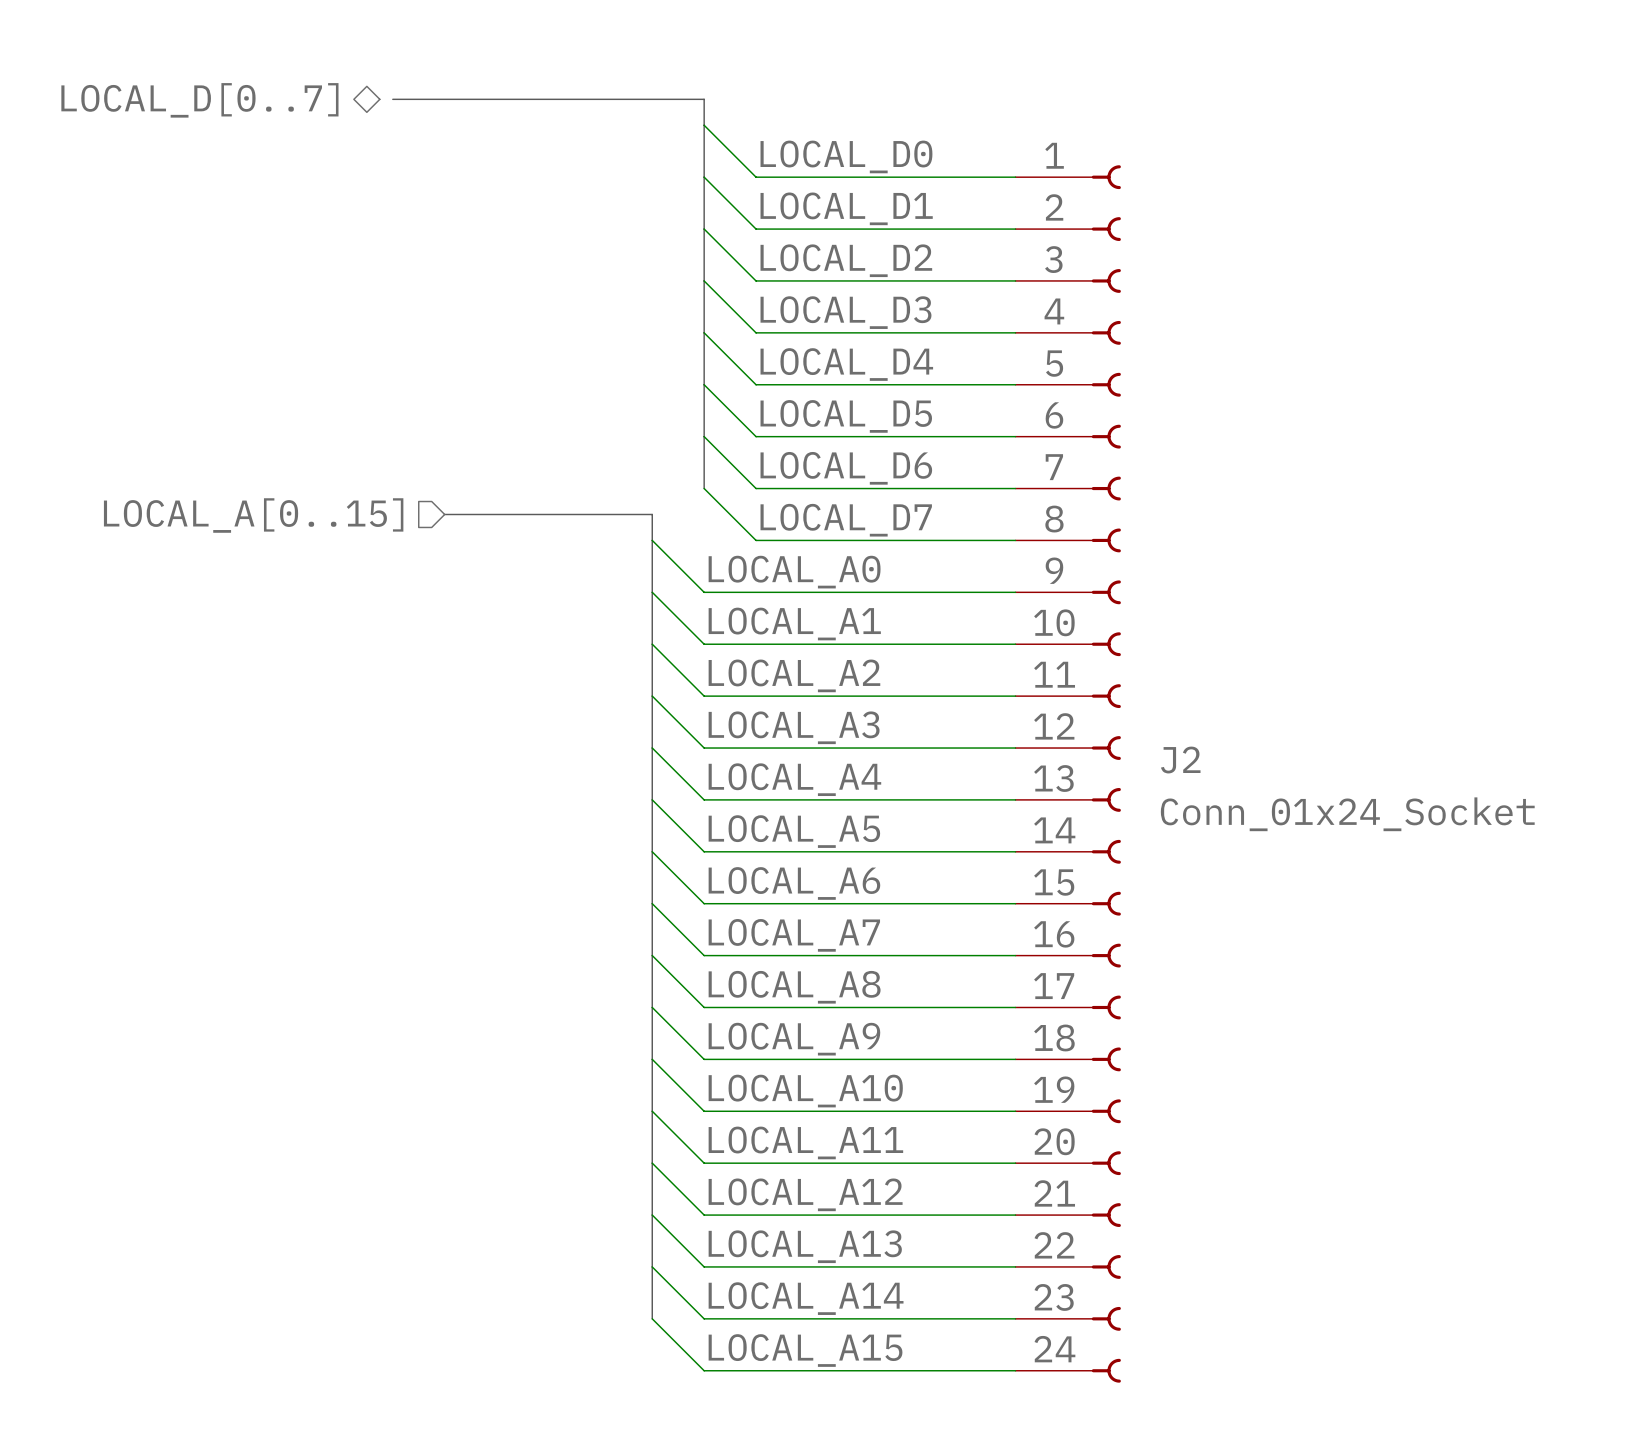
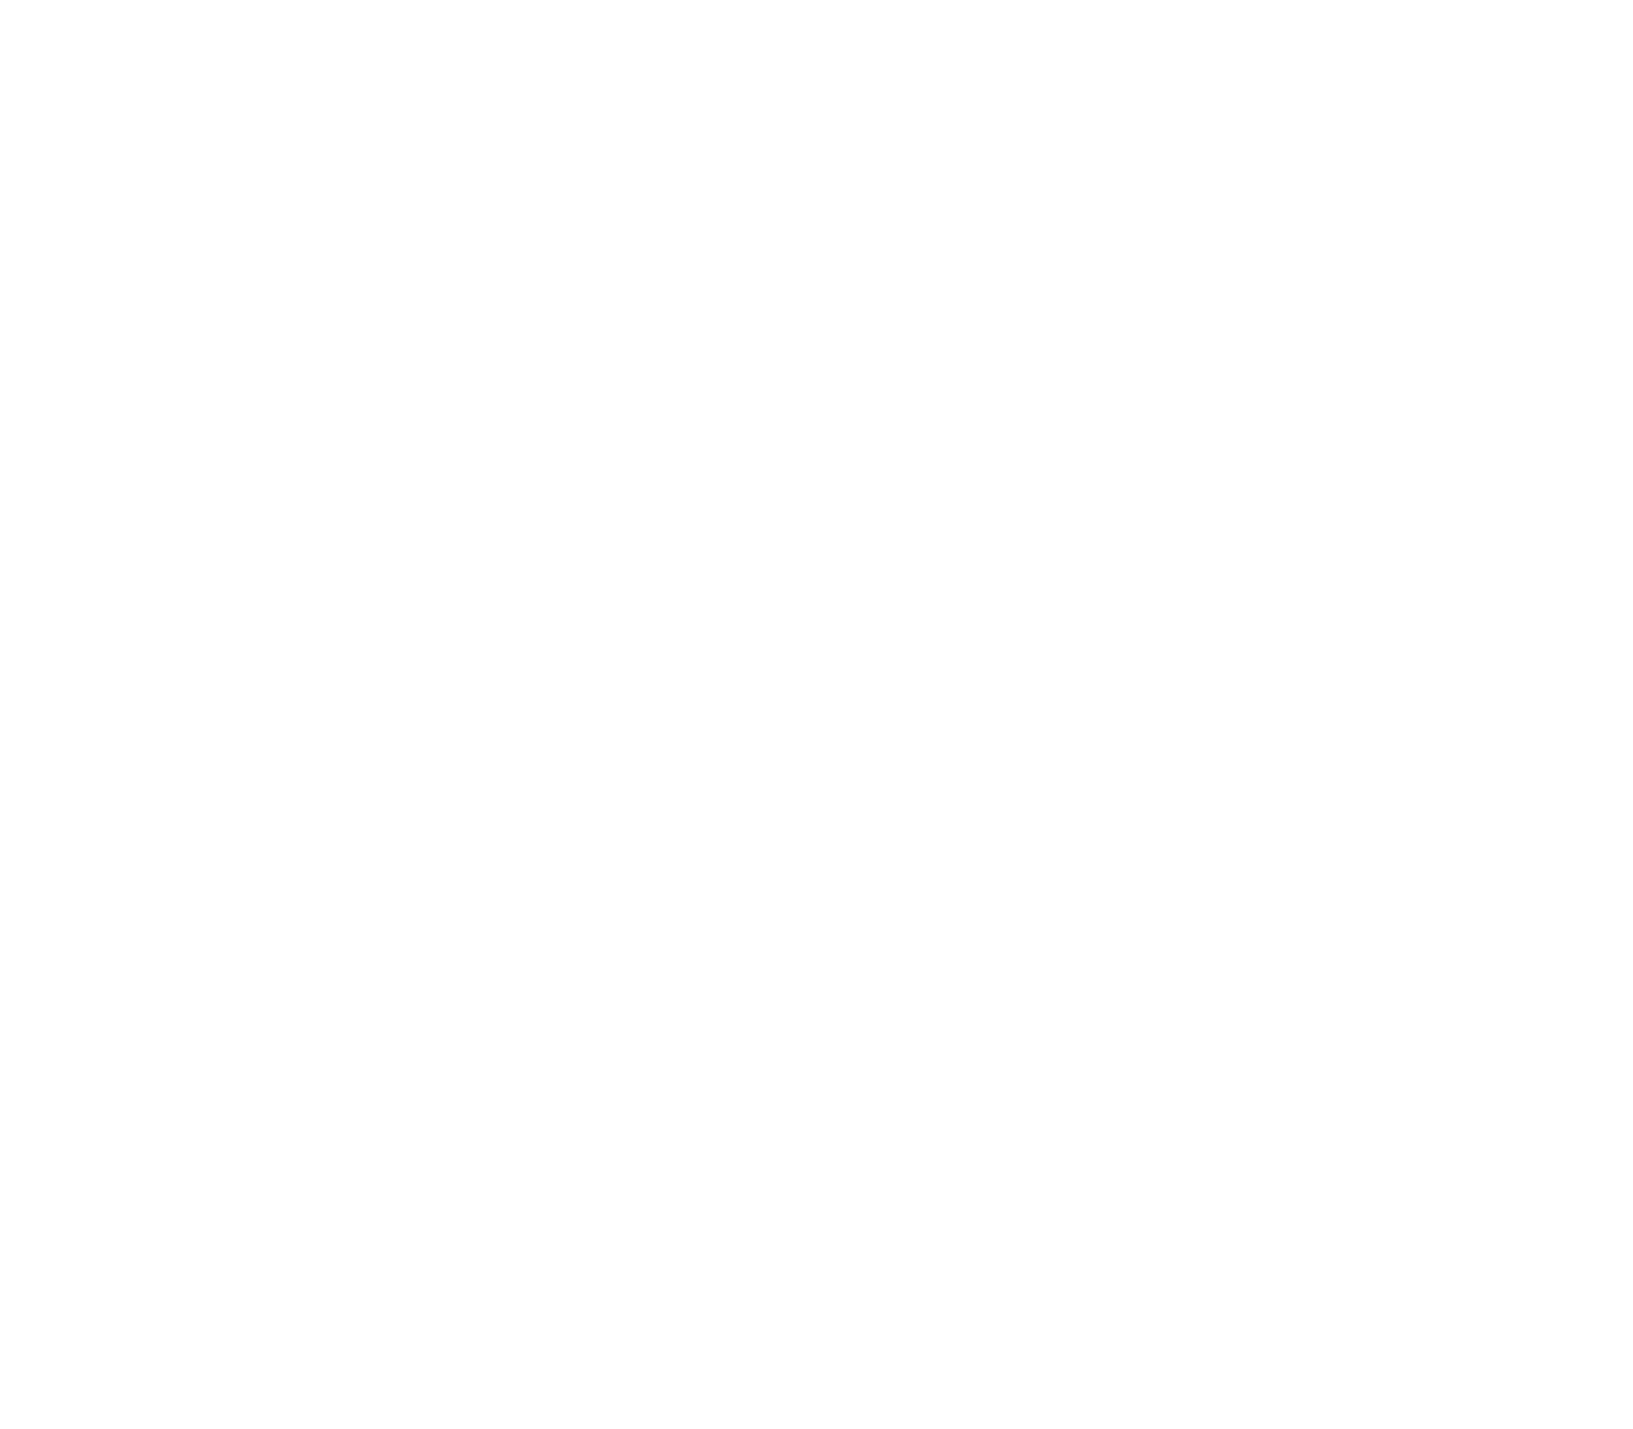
bus: (392, 99) (704, 99) (704, 488) -> none
hierarchical label: LOCAL_D[0..7] (199, 100) -> none
wire: (704, 125) (756, 177) (1015, 177) -> none
label: LOCAL_D0 (846, 156) -> none
wire: (704, 177) (756, 229) (1015, 229) -> none
label: LOCAL_D1 (846, 208) -> none
wire: (704, 229) (756, 280) (1015, 280) -> none
label: LOCAL_D2 (846, 260) -> none
wire: (704, 280) (756, 332) (1015, 332) -> none
label: LOCAL_D3 (845, 312) -> none
wire: (704, 332) (756, 384) (1015, 384) -> none
label: LOCAL_D4 (846, 364) -> none
wire: (704, 384) (756, 436) (1015, 436) -> none
label: LOCAL_D5 (846, 416) -> none
wire: (704, 436) (756, 488) -> none
label: LOCAL_D6 (846, 468) -> none
wire: (704, 488) (756, 540) (1015, 540) -> none
wire: (756, 488) (1015, 488) -> none
bus: (444, 514) (652, 514) (652, 1318) -> none
hierarchical label: LOCAL_A[0..15] (253, 515) -> none
label: LOCAL_D7 (846, 520) -> none
wire: (652, 540) (704, 592) -> none
label: LOCAL_A0 (794, 572) -> none
wire: (652, 592) (704, 644) (1015, 644) -> none
wire: (704, 592) (1015, 592) -> none
label: LOCAL_A1 (794, 623) -> none
wire: (652, 644) (704, 696) -> none
label: LOCAL_A2 (794, 675) -> none
wire: (652, 696) (704, 748) (1015, 748) -> none
wire: (704, 696) (1015, 696) -> none
label: LOCAL_A3 (794, 727) -> none
wire: (652, 748) (704, 799) (1015, 799) -> none
J2: Conn_01x24_Socket (1068, 773) -> none
label: LOCAL_A4 (794, 779) -> none
wire: (652, 799) (704, 851) -> none
label: LOCAL_A5 (794, 831) -> none
wire: (652, 851) (704, 903) (1015, 903) -> none
wire: (704, 851) (1015, 851) -> none
label: LOCAL_A6 (794, 883) -> none
wire: (652, 903) (704, 955) -> none
label: LOCAL_A7 (794, 935) -> none
wire: (652, 955) (704, 1007) (1015, 1007) -> none
wire: (704, 955) (1015, 955) -> none
label: LOCAL_A8 (794, 987) -> none
wire: (652, 1007) (704, 1059) -> none
label: LOCAL_A9 (794, 1039) -> none
wire: (652, 1059) (704, 1111) (1015, 1111) -> none
wire: (704, 1059) (1015, 1059) -> none
label: LOCAL_A10 (805, 1091) -> none
wire: (652, 1111) (704, 1163) -> none
label: LOCAL_A11 (805, 1142) -> none
wire: (652, 1163) (704, 1215) (1015, 1215) -> none
wire: (704, 1163) (1015, 1163) -> none
label: LOCAL_A12 (805, 1194) -> none
wire: (652, 1215) (704, 1266) (1015, 1266) -> none
label: LOCAL_A13 (805, 1246) -> none
wire: (652, 1266) (704, 1318) -> none
label: LOCAL_A14 (806, 1298) -> none
wire: (652, 1318) (704, 1370) (1015, 1370) -> none
wire: (704, 1318) (1015, 1318) -> none
label: LOCAL_A15 (805, 1350) -> none

